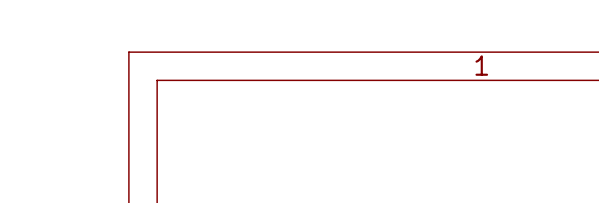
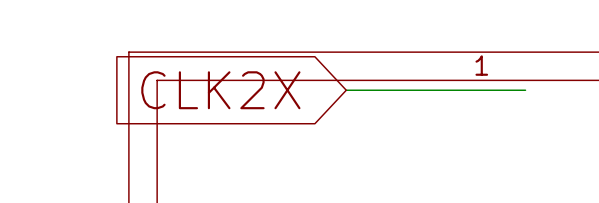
global label: none -> CLK2X (220, 90)
wire: none -> (346, 90) (525, 90)

